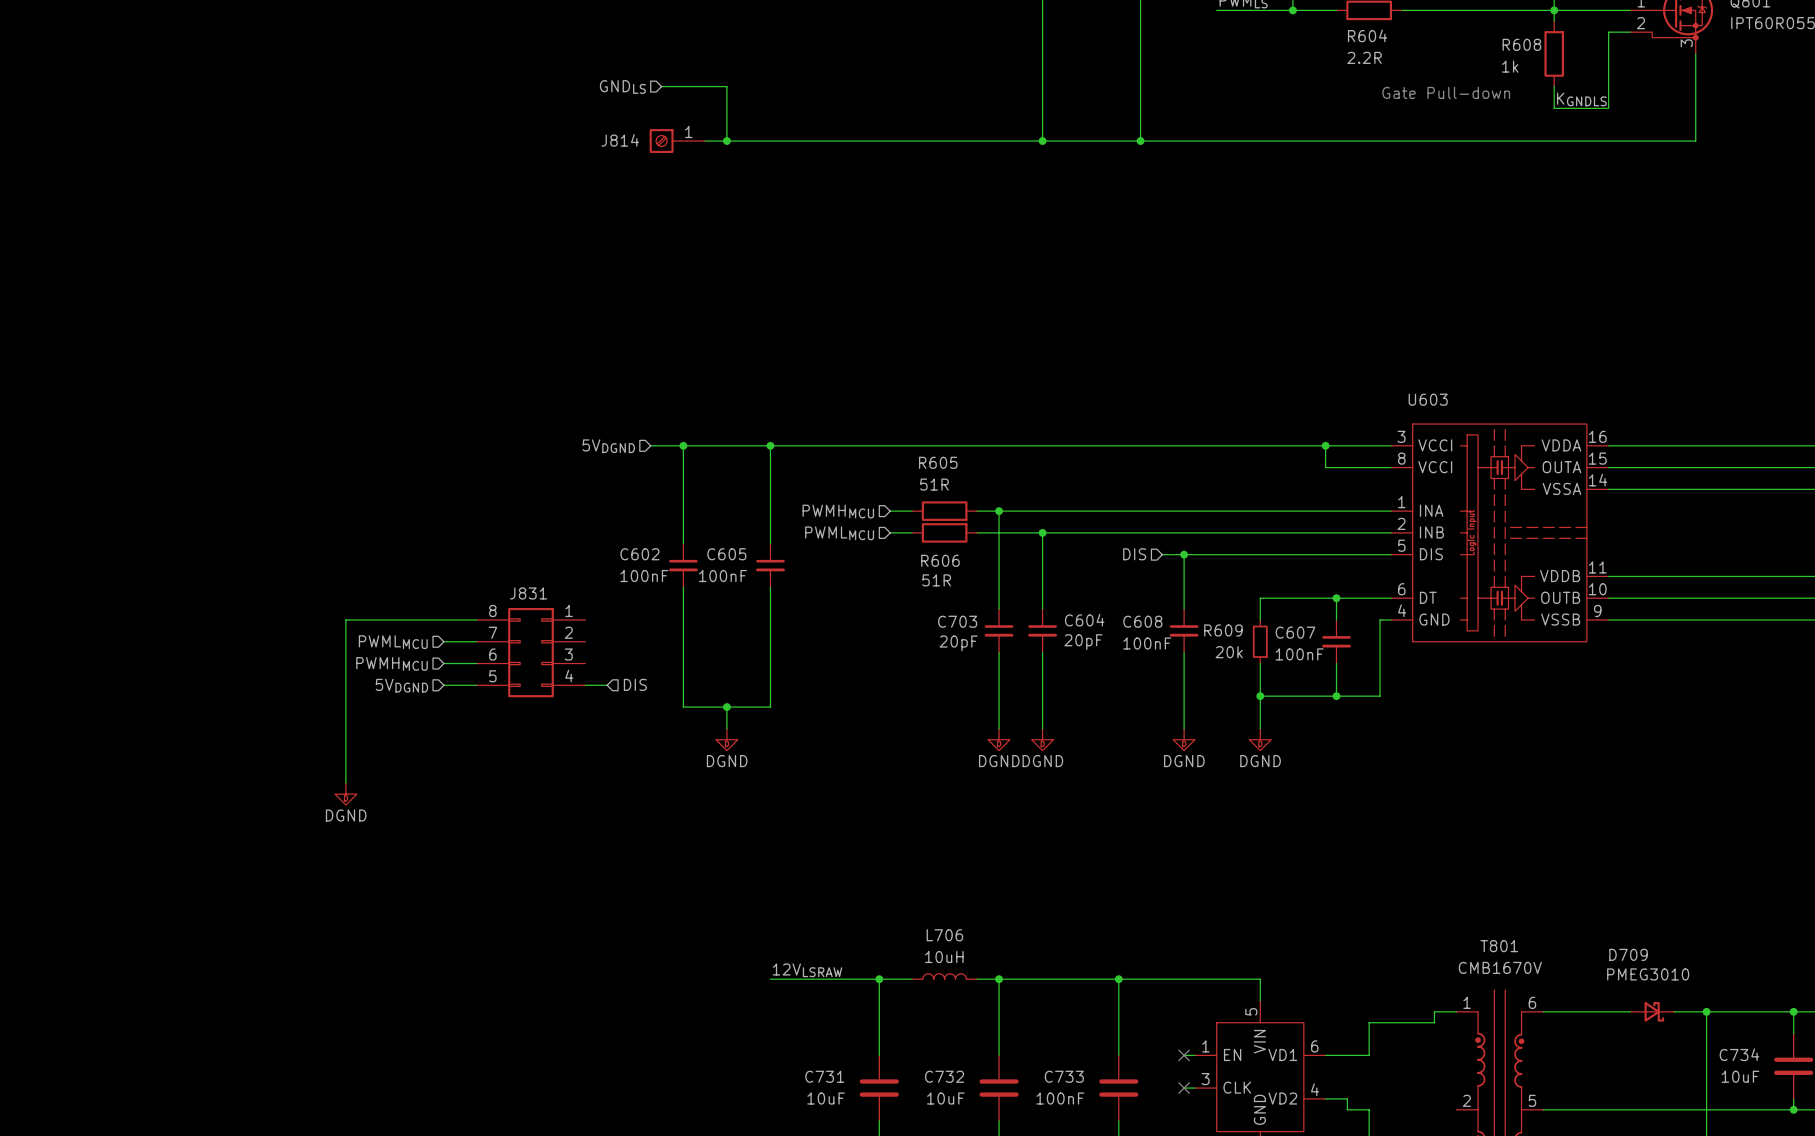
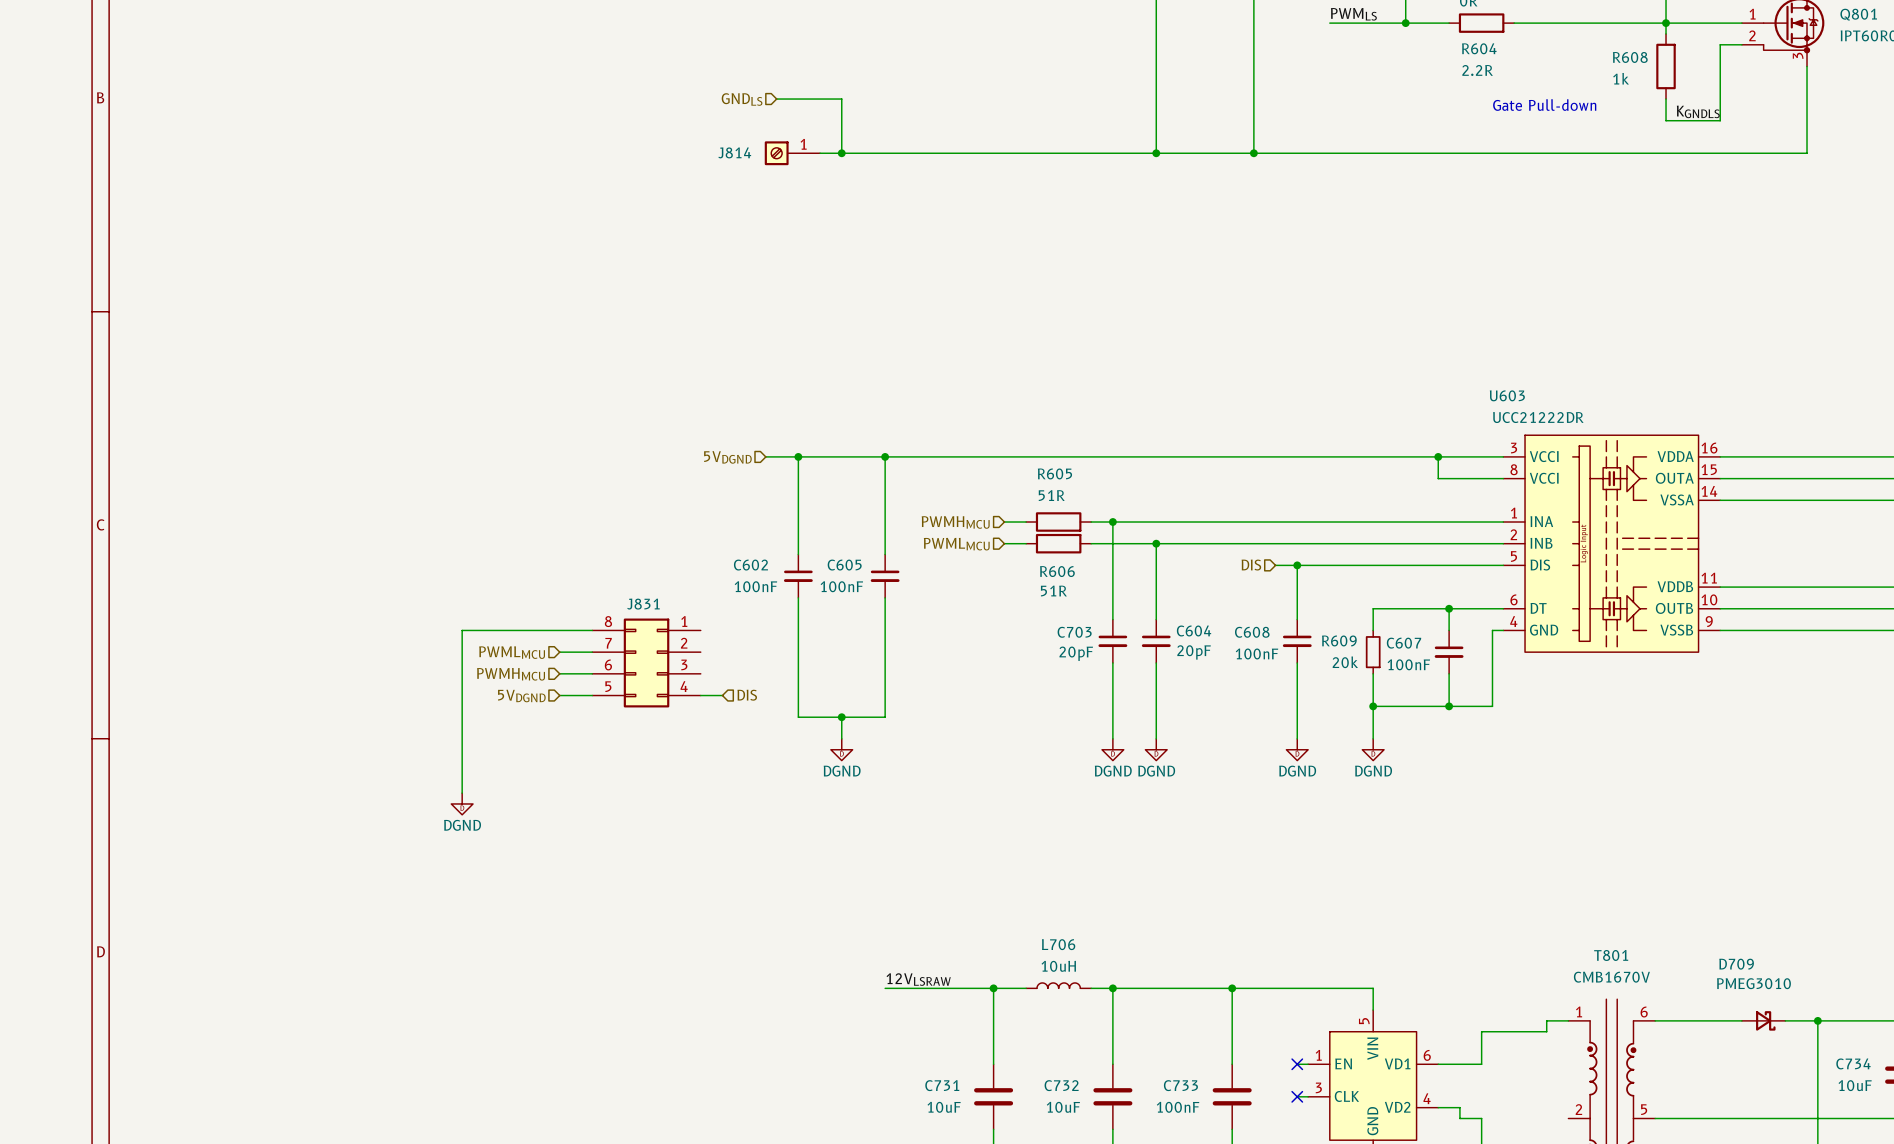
U603 name position: U603 (1428, 399) -> U603 (1507, 395)
U603 value: none -> UCC21222DR (1538, 417)

